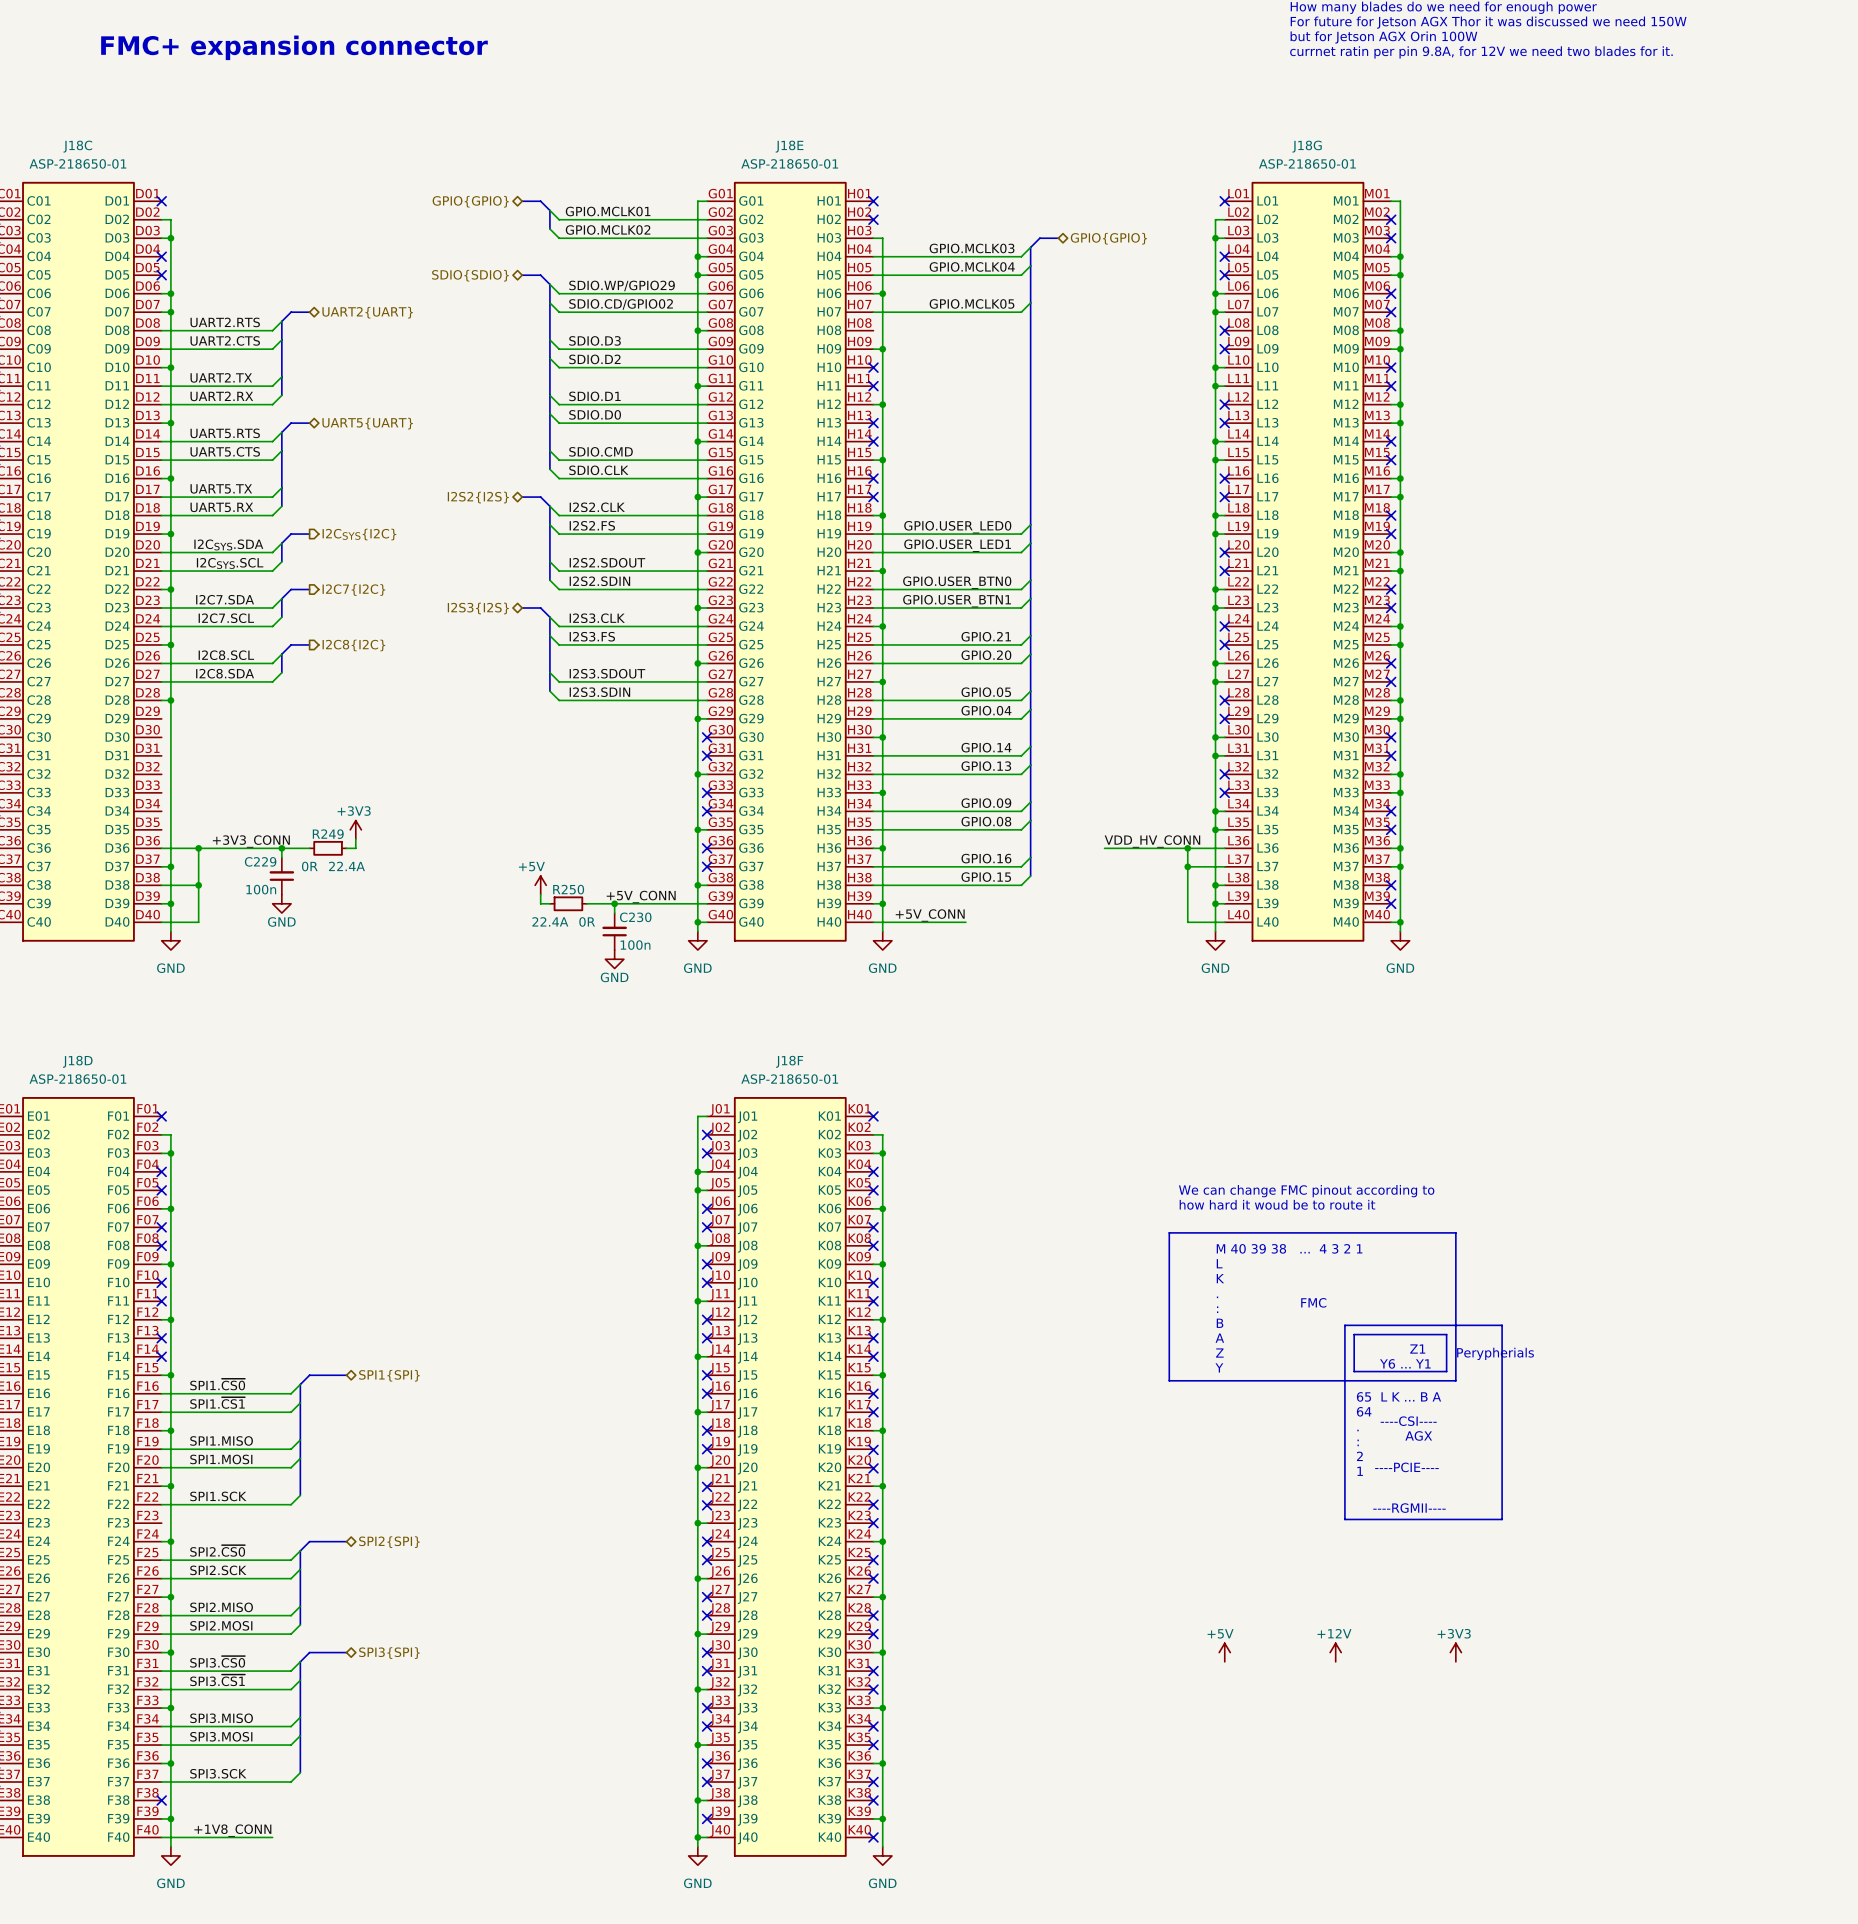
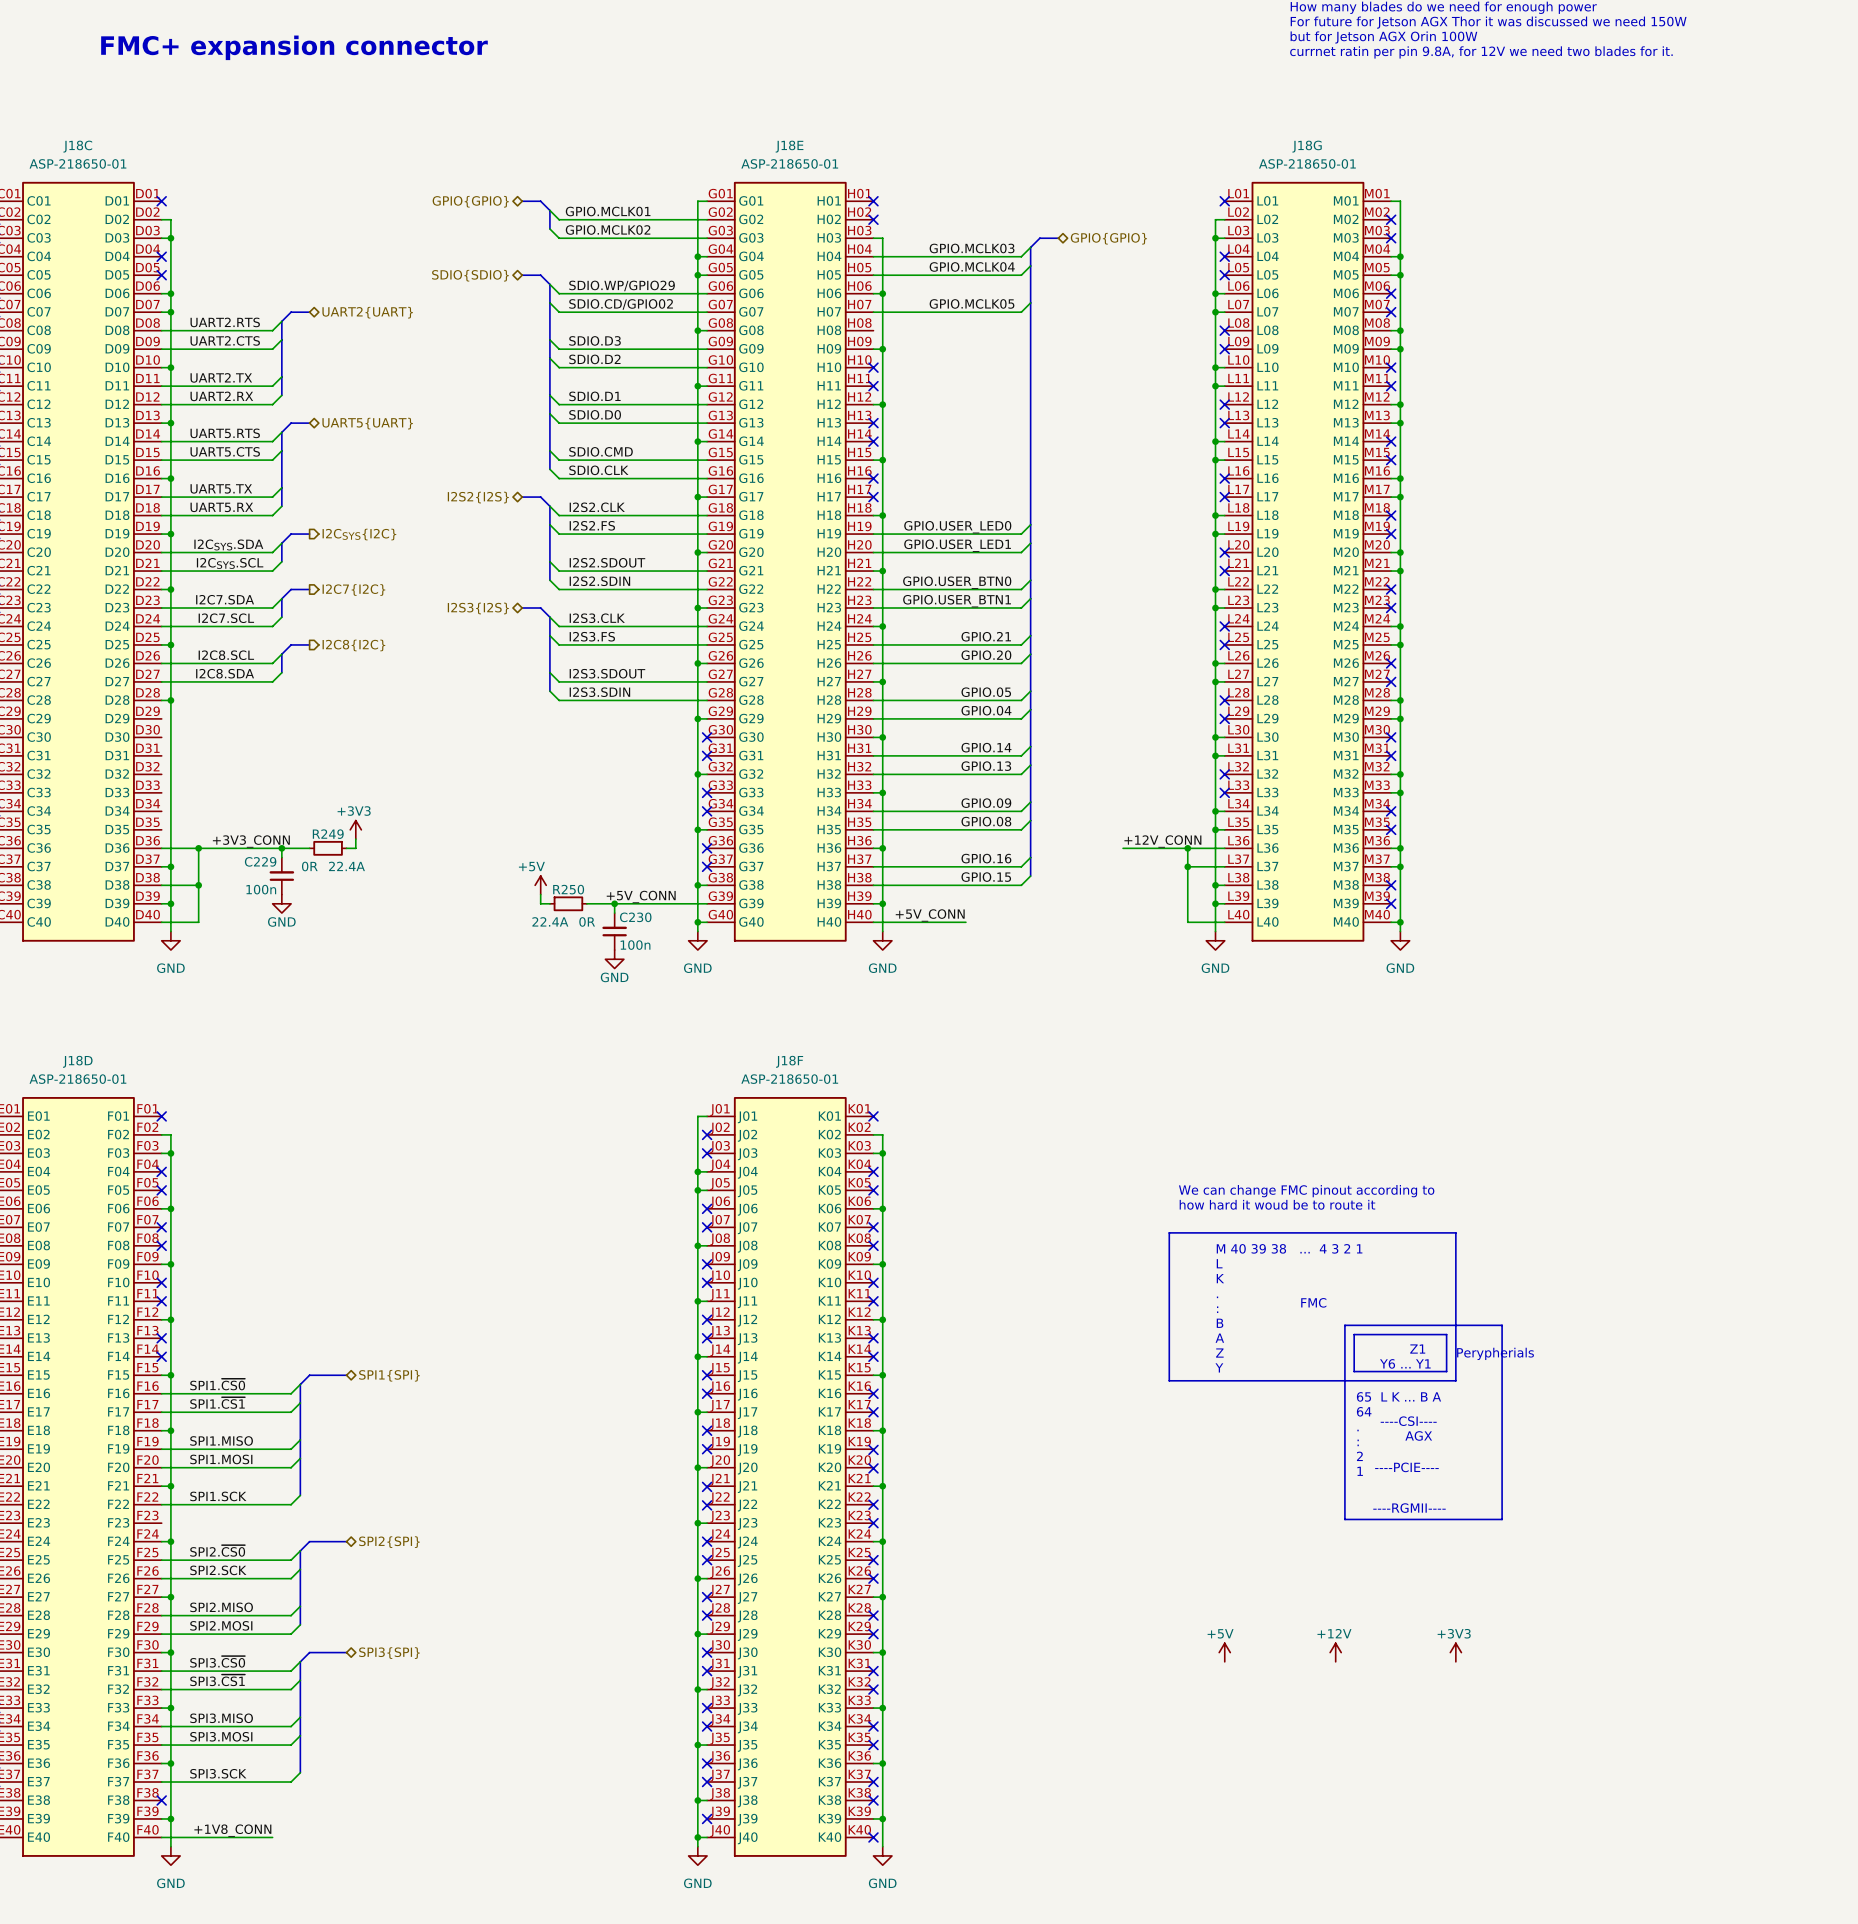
label: VDD_HV_CONN (1152, 841) -> none
label: none -> +12V_CONN (1162, 841)
wire: (1104, 848) (1123, 848) -> none

